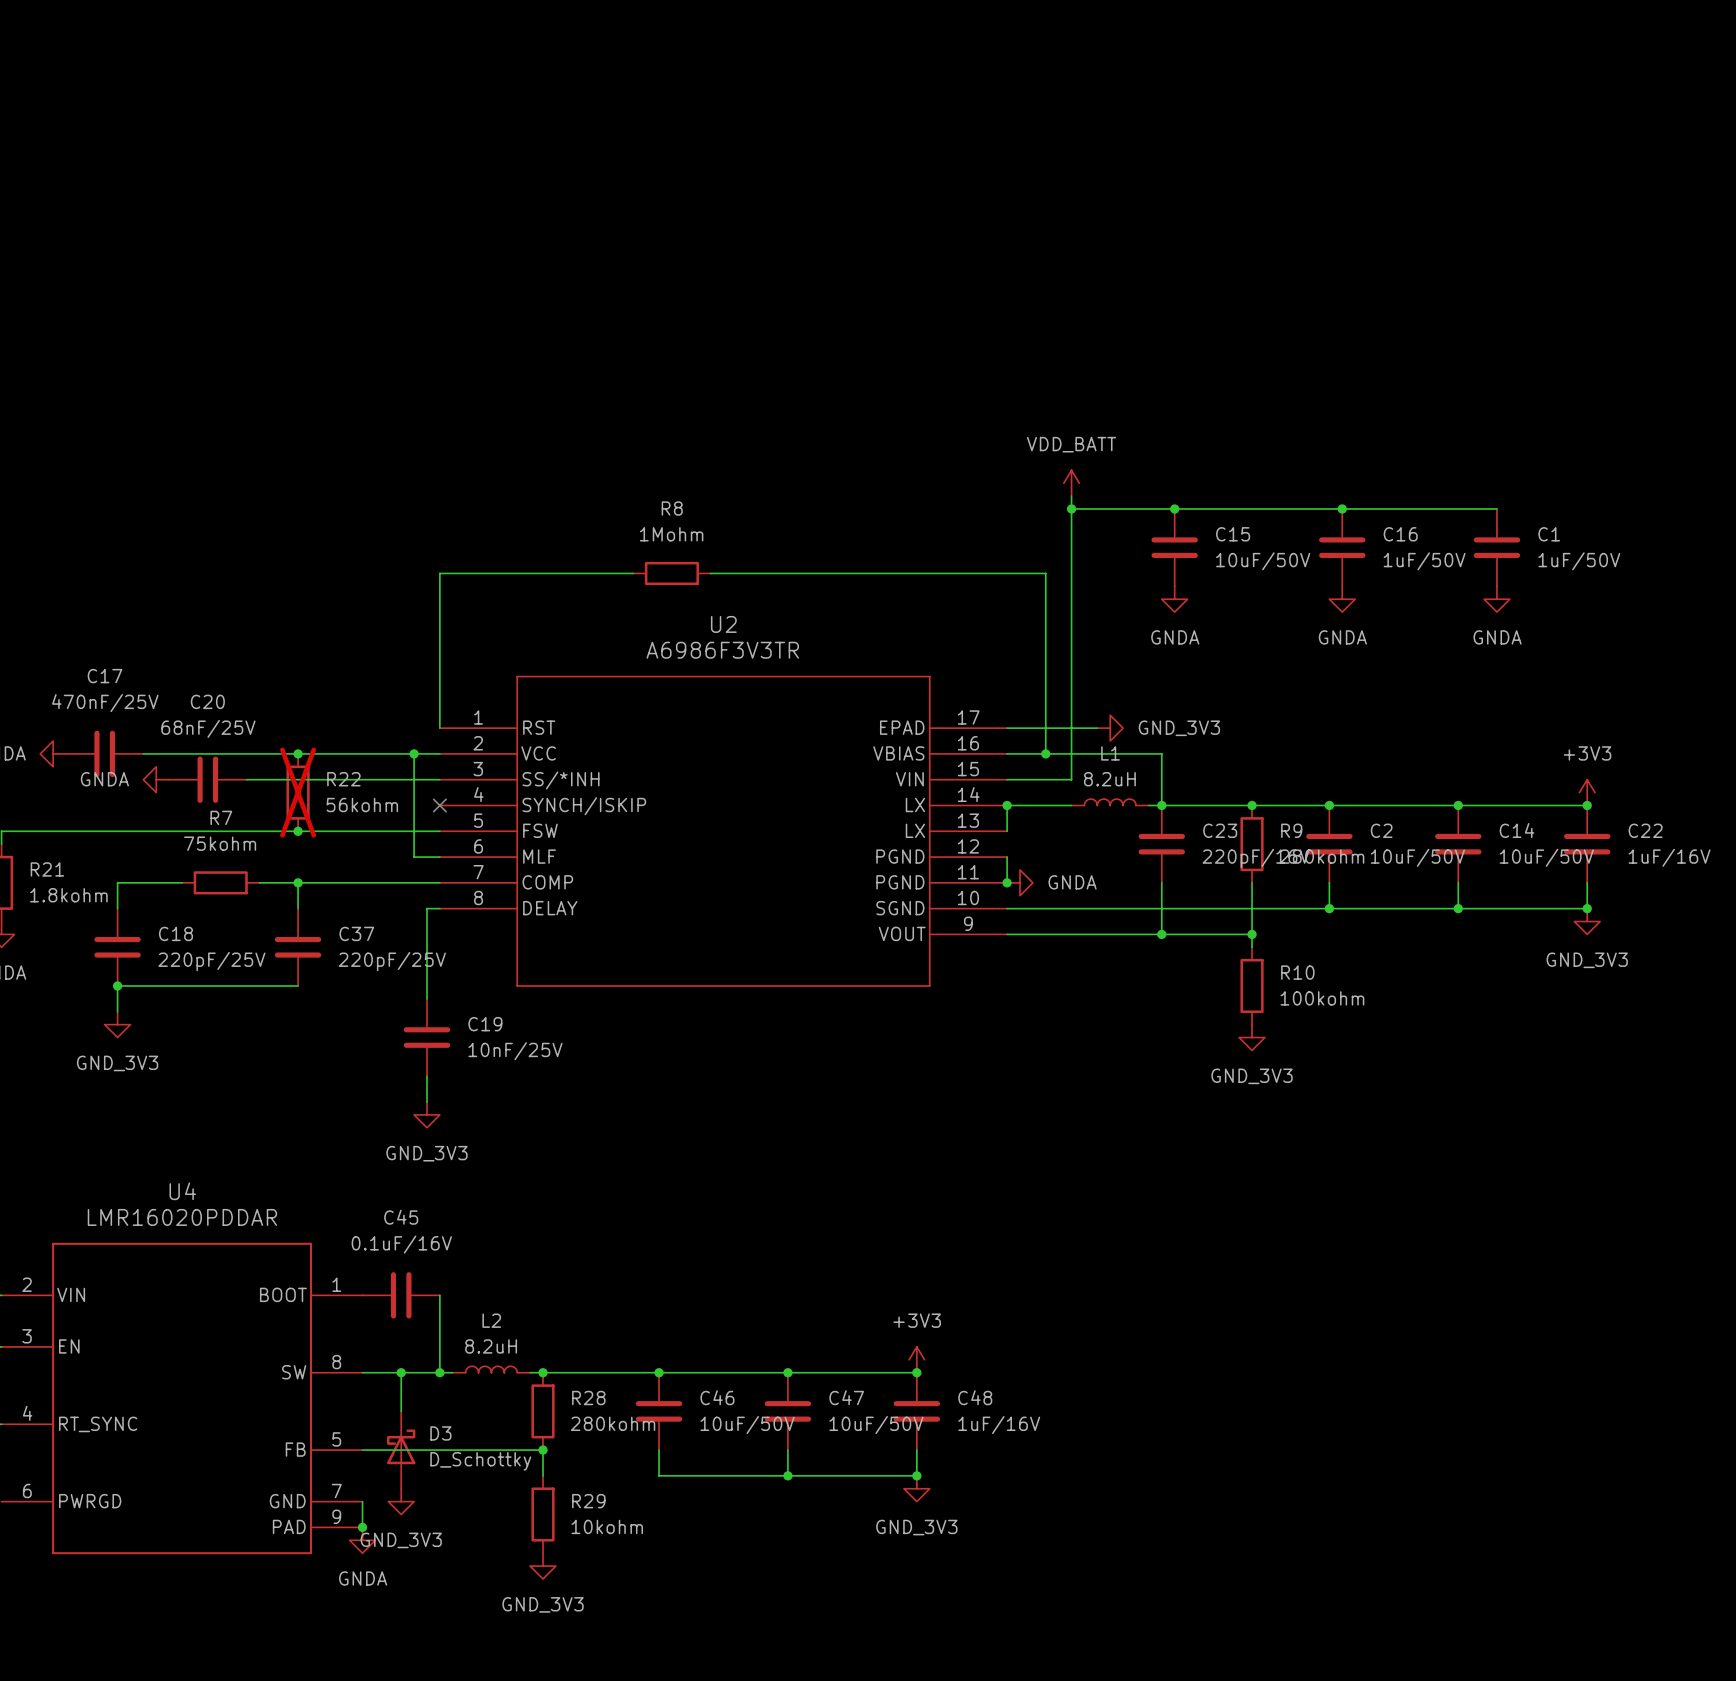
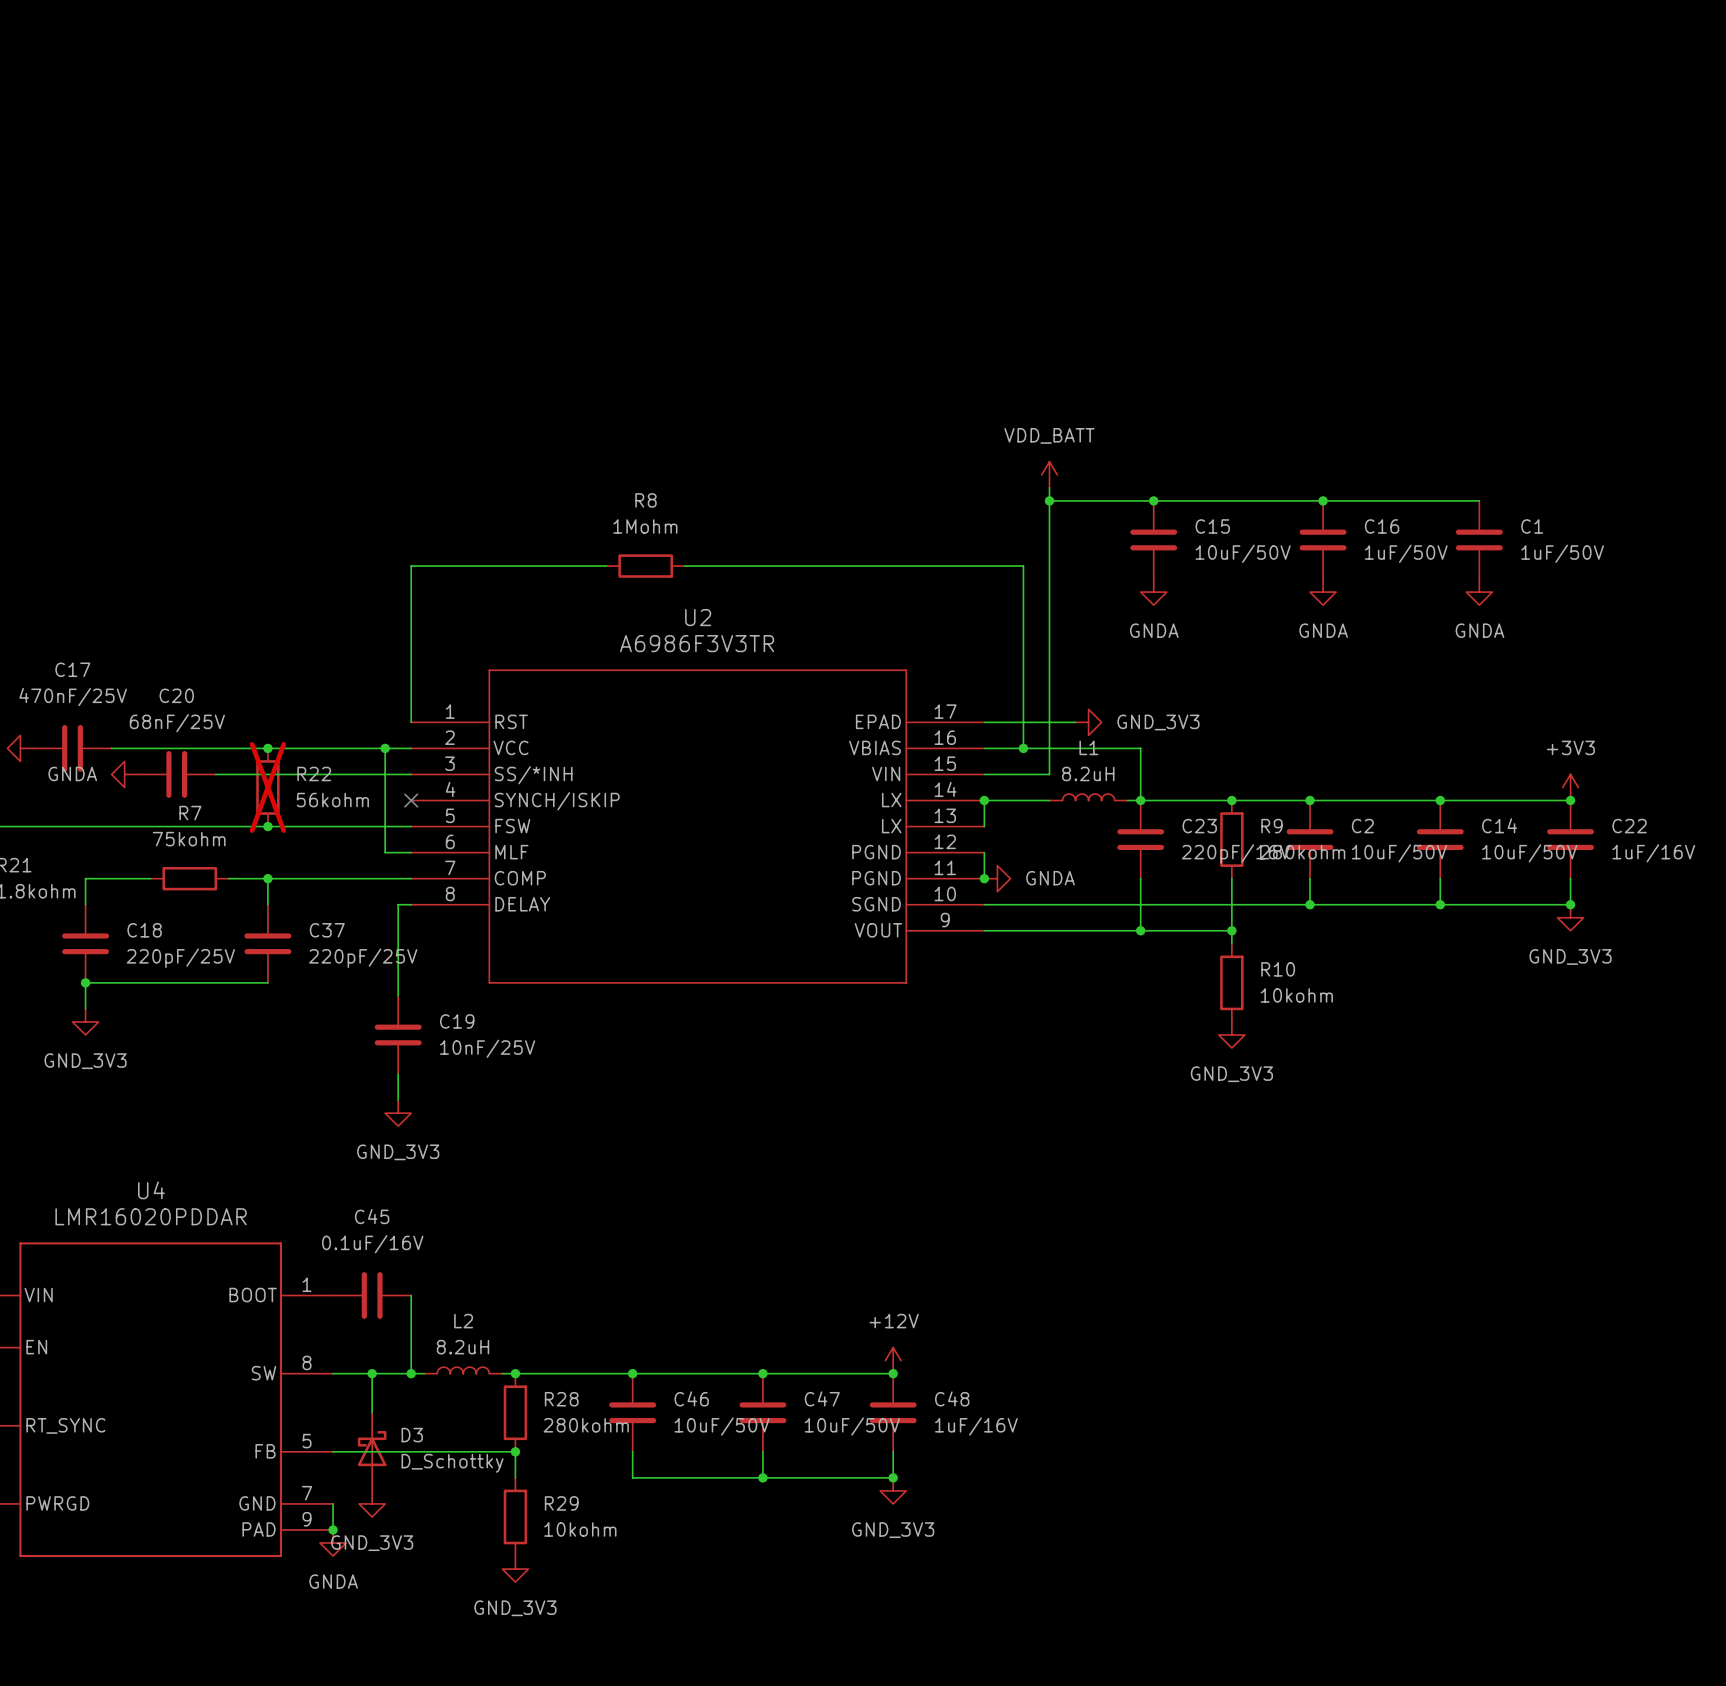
R10 value: 100kohm (1322, 998) -> 10kohm (1296, 995)
power symbol: +3V3 (916, 1359) -> +12V (893, 1360)

